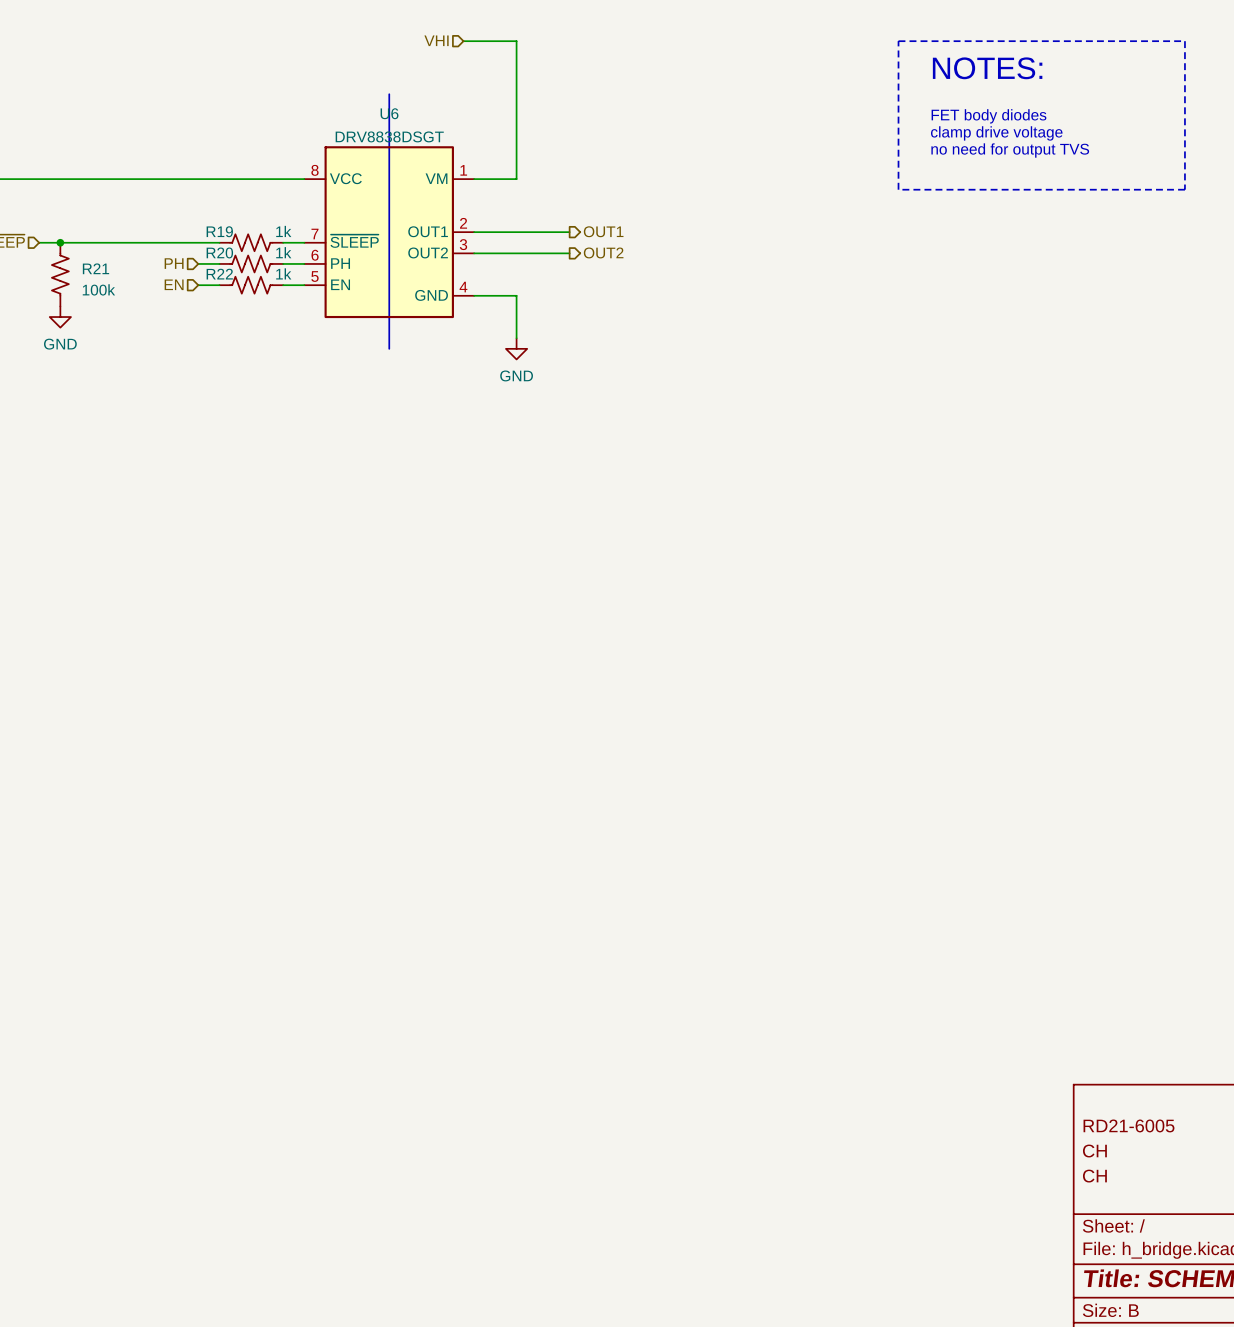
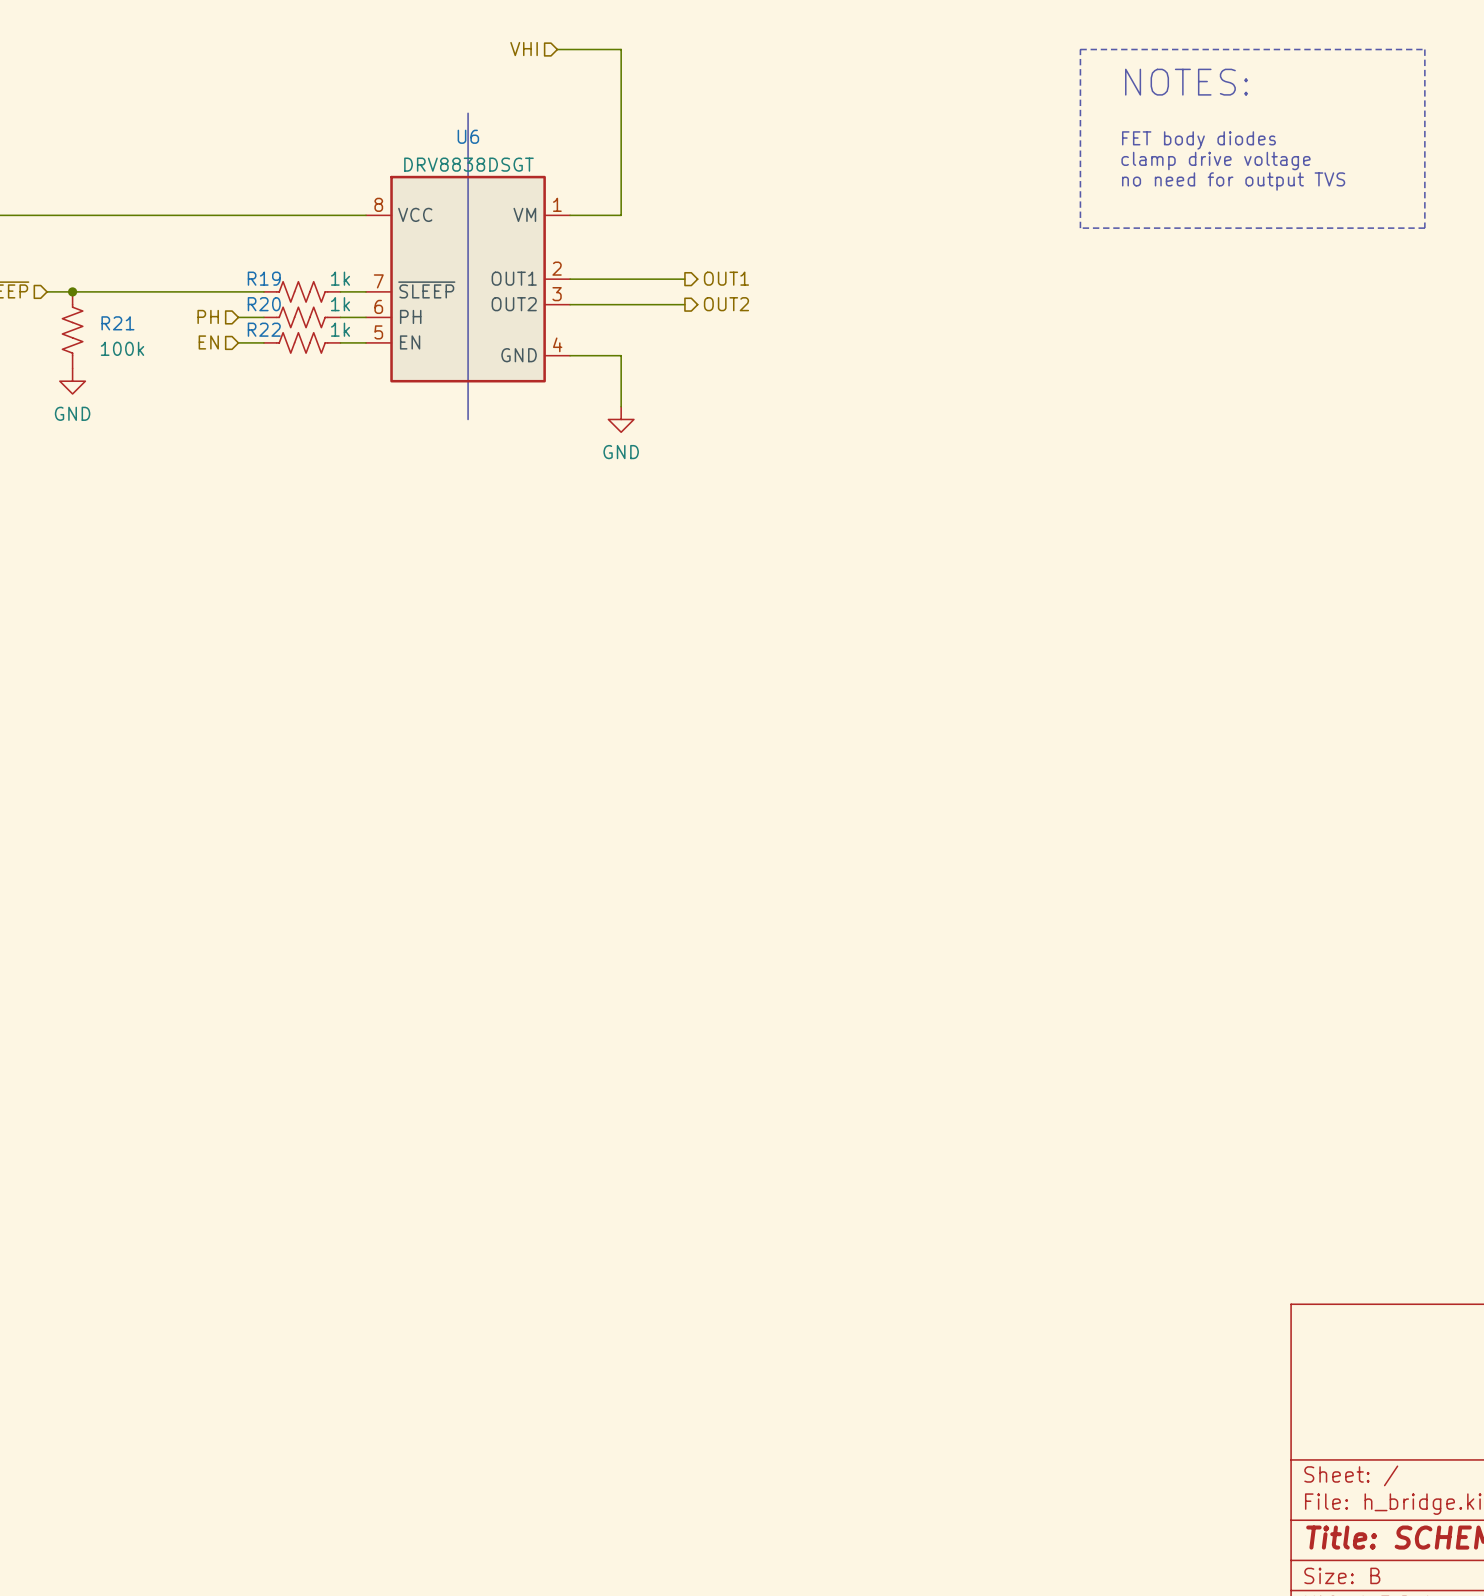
title block: RD21-6005 (1128, 1125) -> none
title block: CH (1094, 1151) -> none
title block: CH (1094, 1176) -> none

